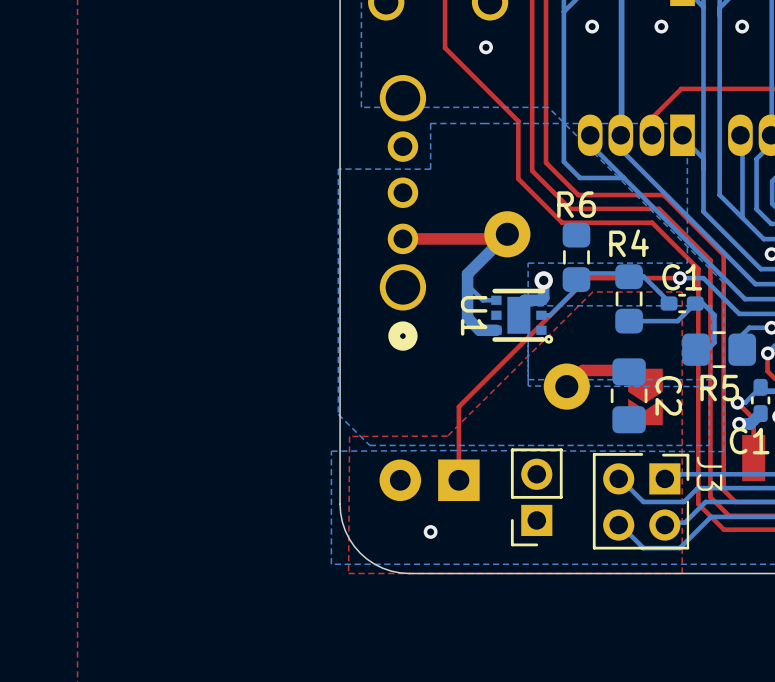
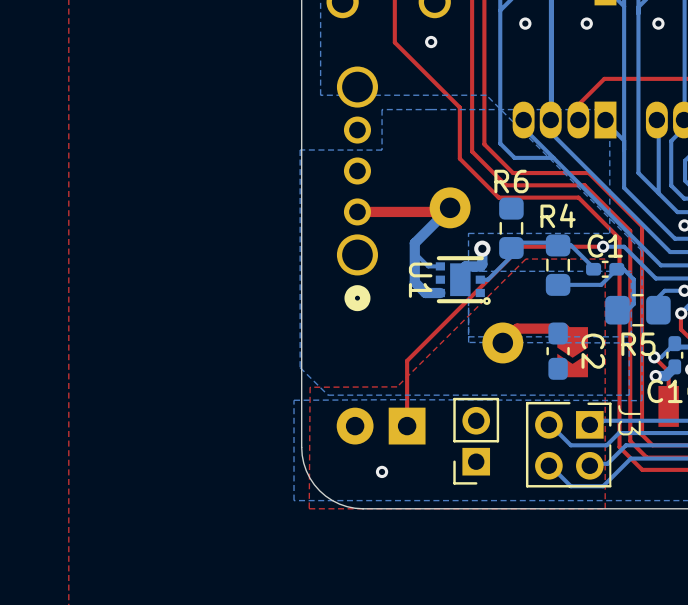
C2 footprint: [610, 358, 648, 434] -> [546, 322, 570, 380]

